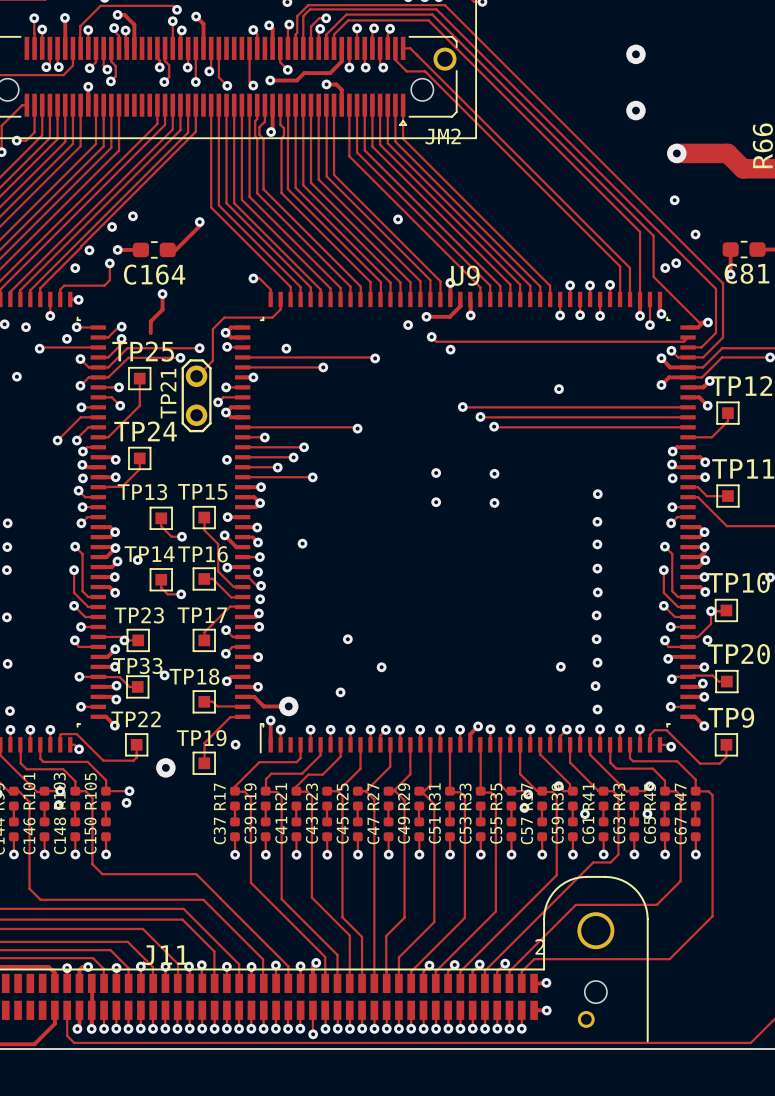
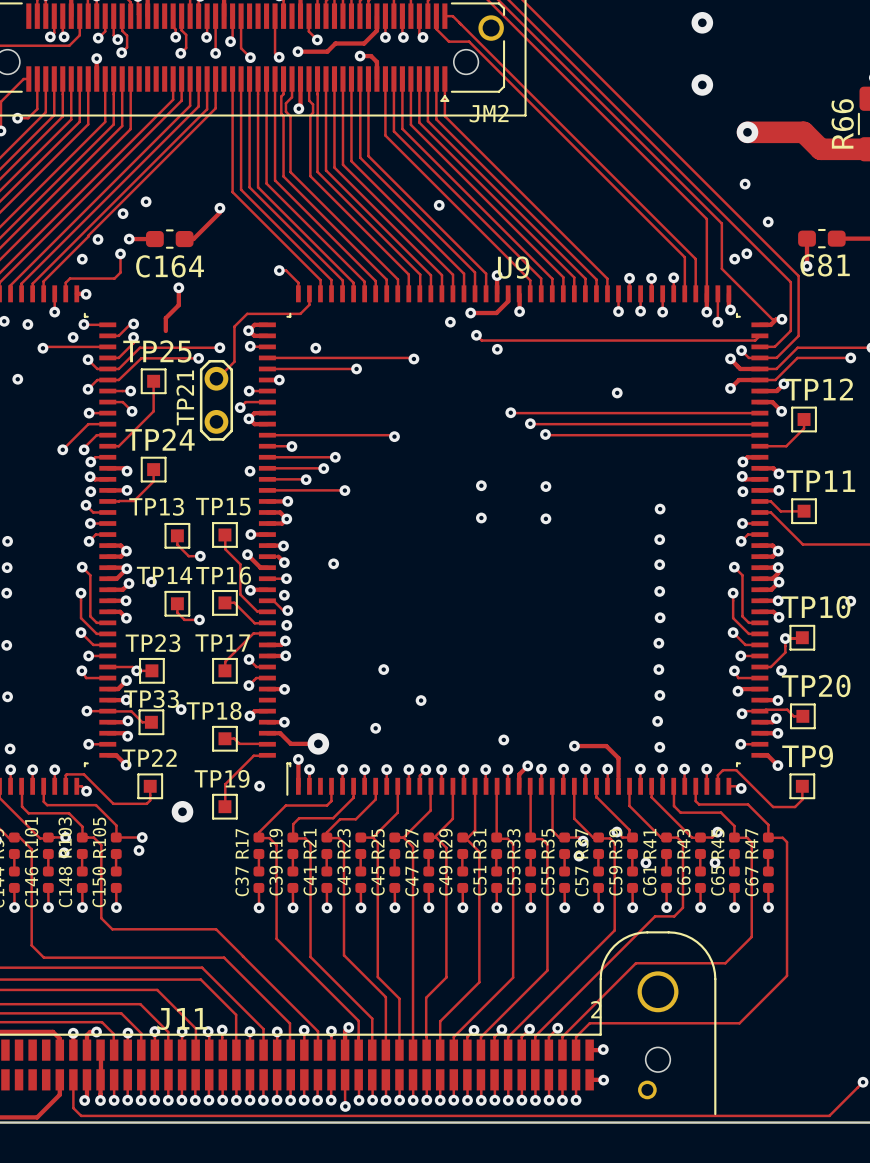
via: (560, 666) -> none
via: none -> (503, 739)
via: none -> (574, 746)
track: (565, 729) (560, 736) -> (574, 746) (606, 746) (618, 758) (618, 776)
via: (566, 729) -> none

